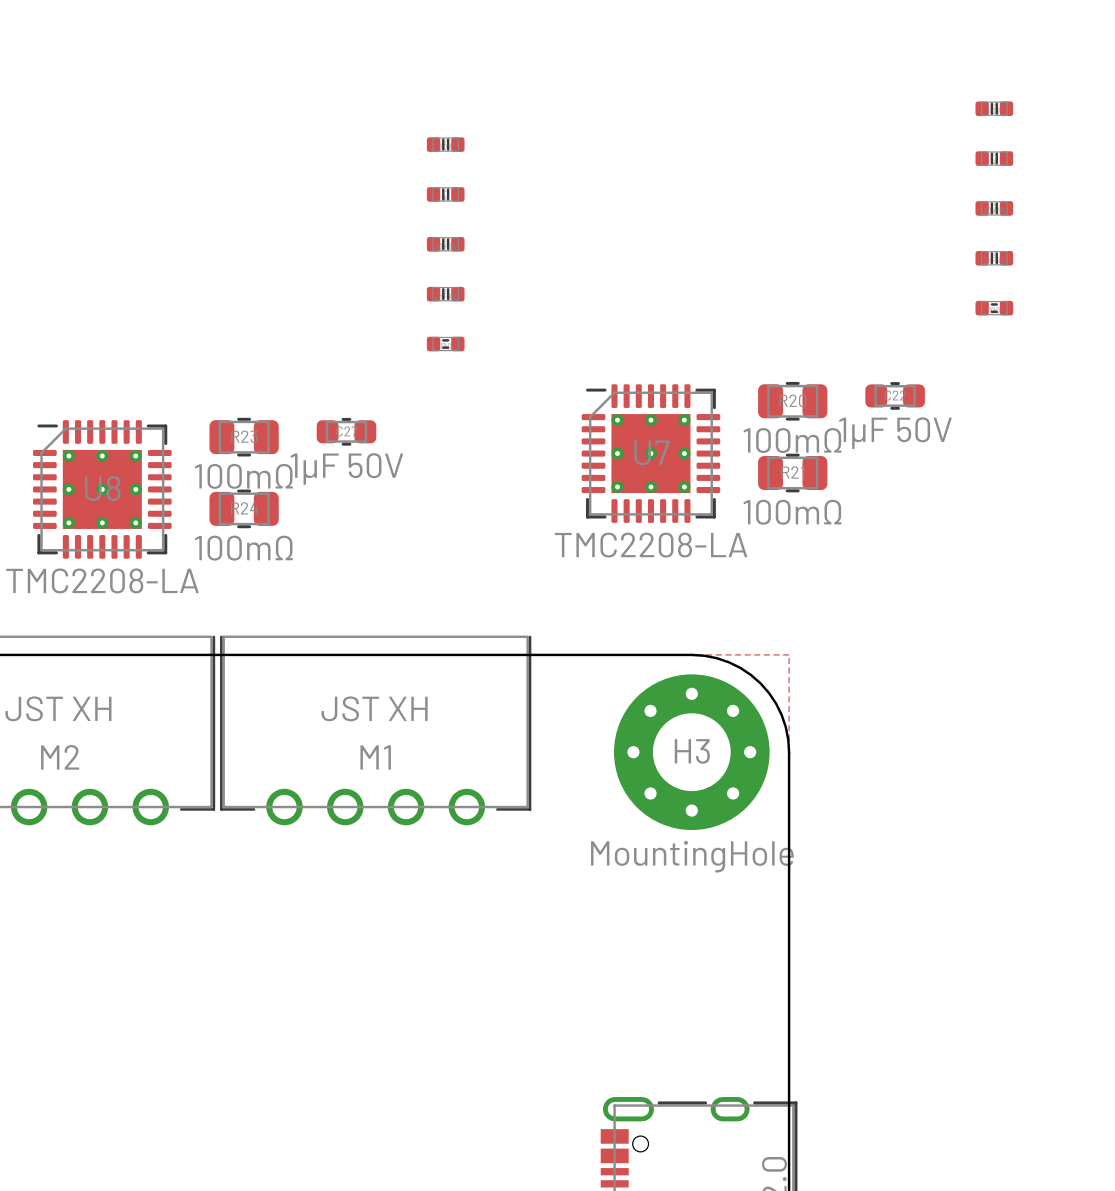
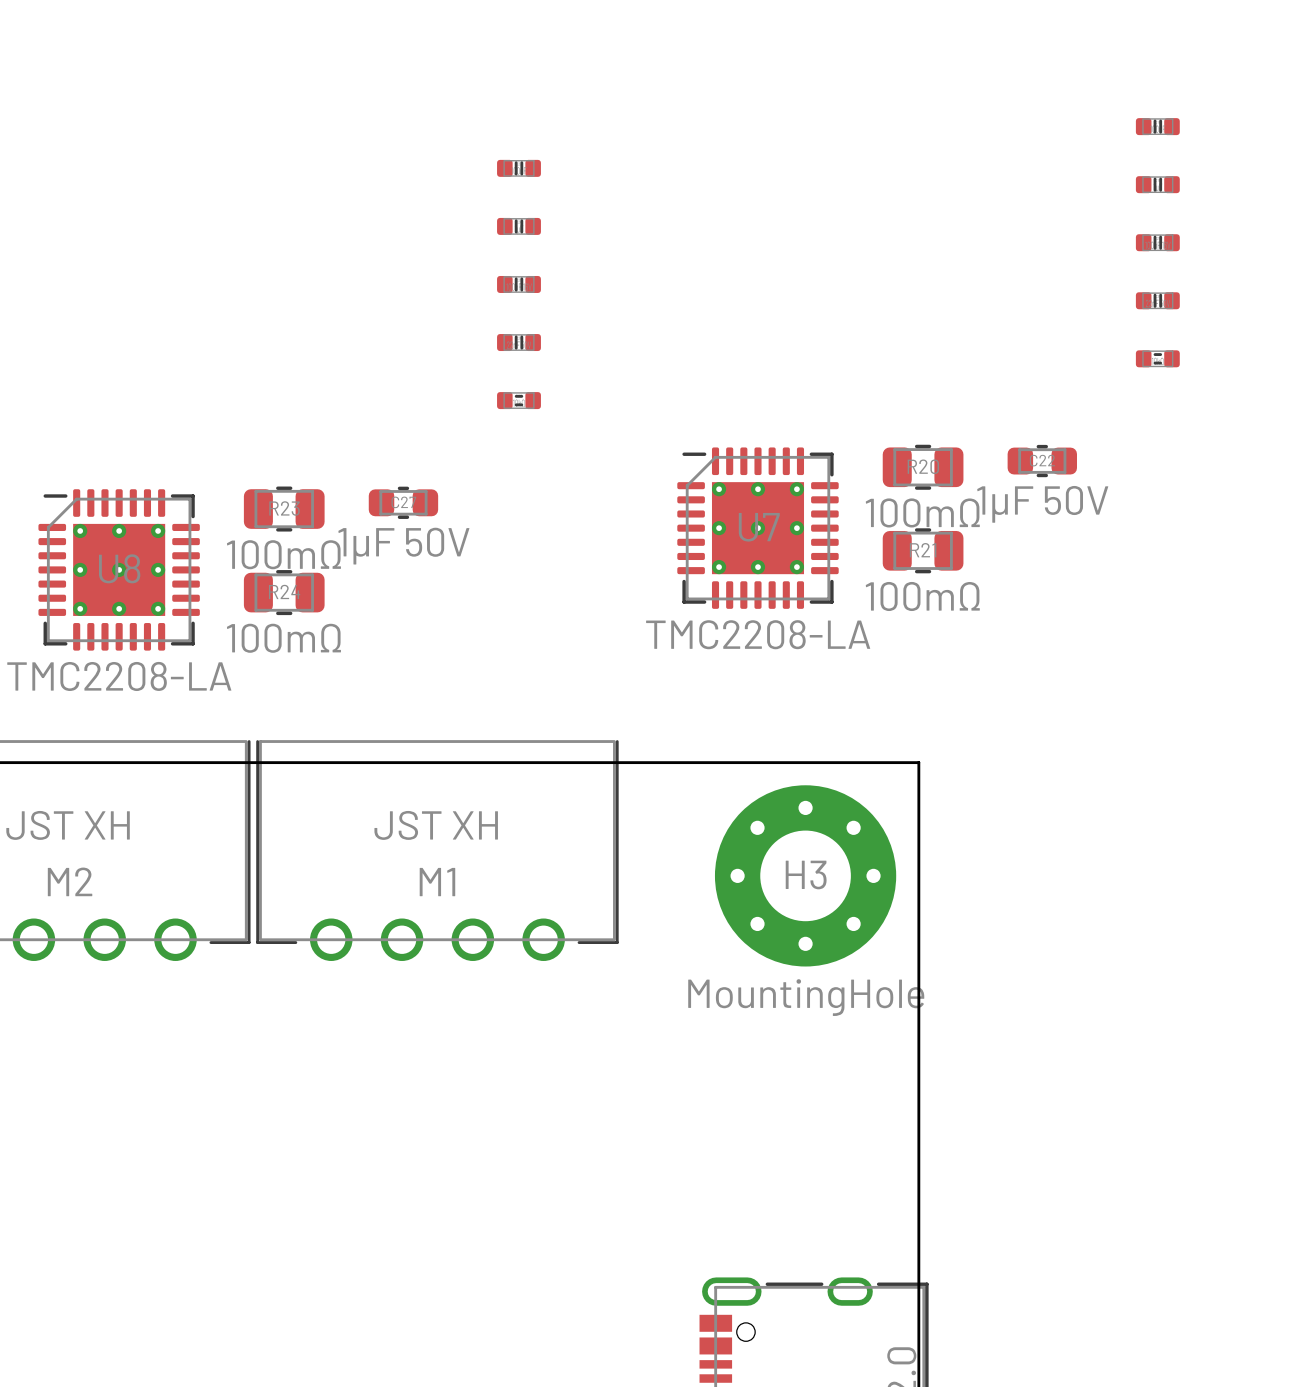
board edge: (691, 654) (716, 658) (729, 662) (751, 675) (760, 683) (768, 692) (781, 714) (785, 727) (789, 752) -> (805, 762) (918, 762) (918, 875)

